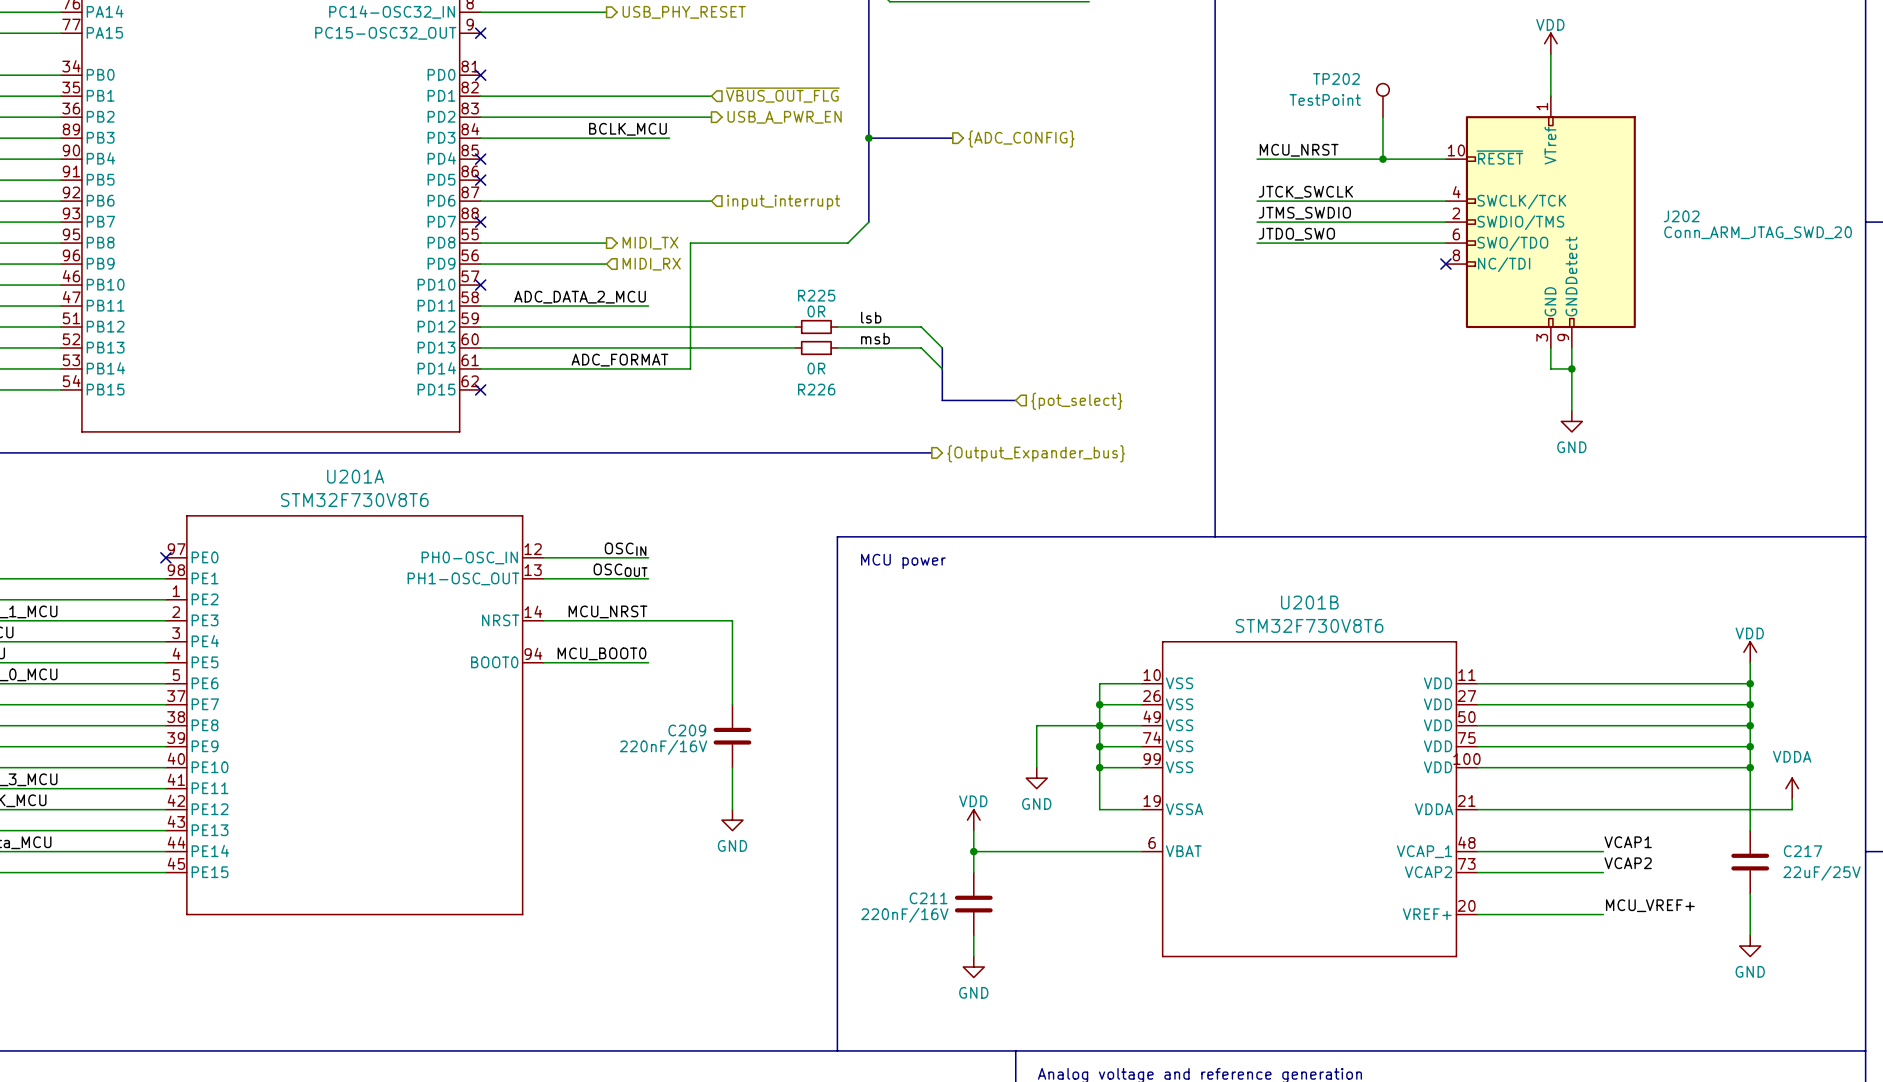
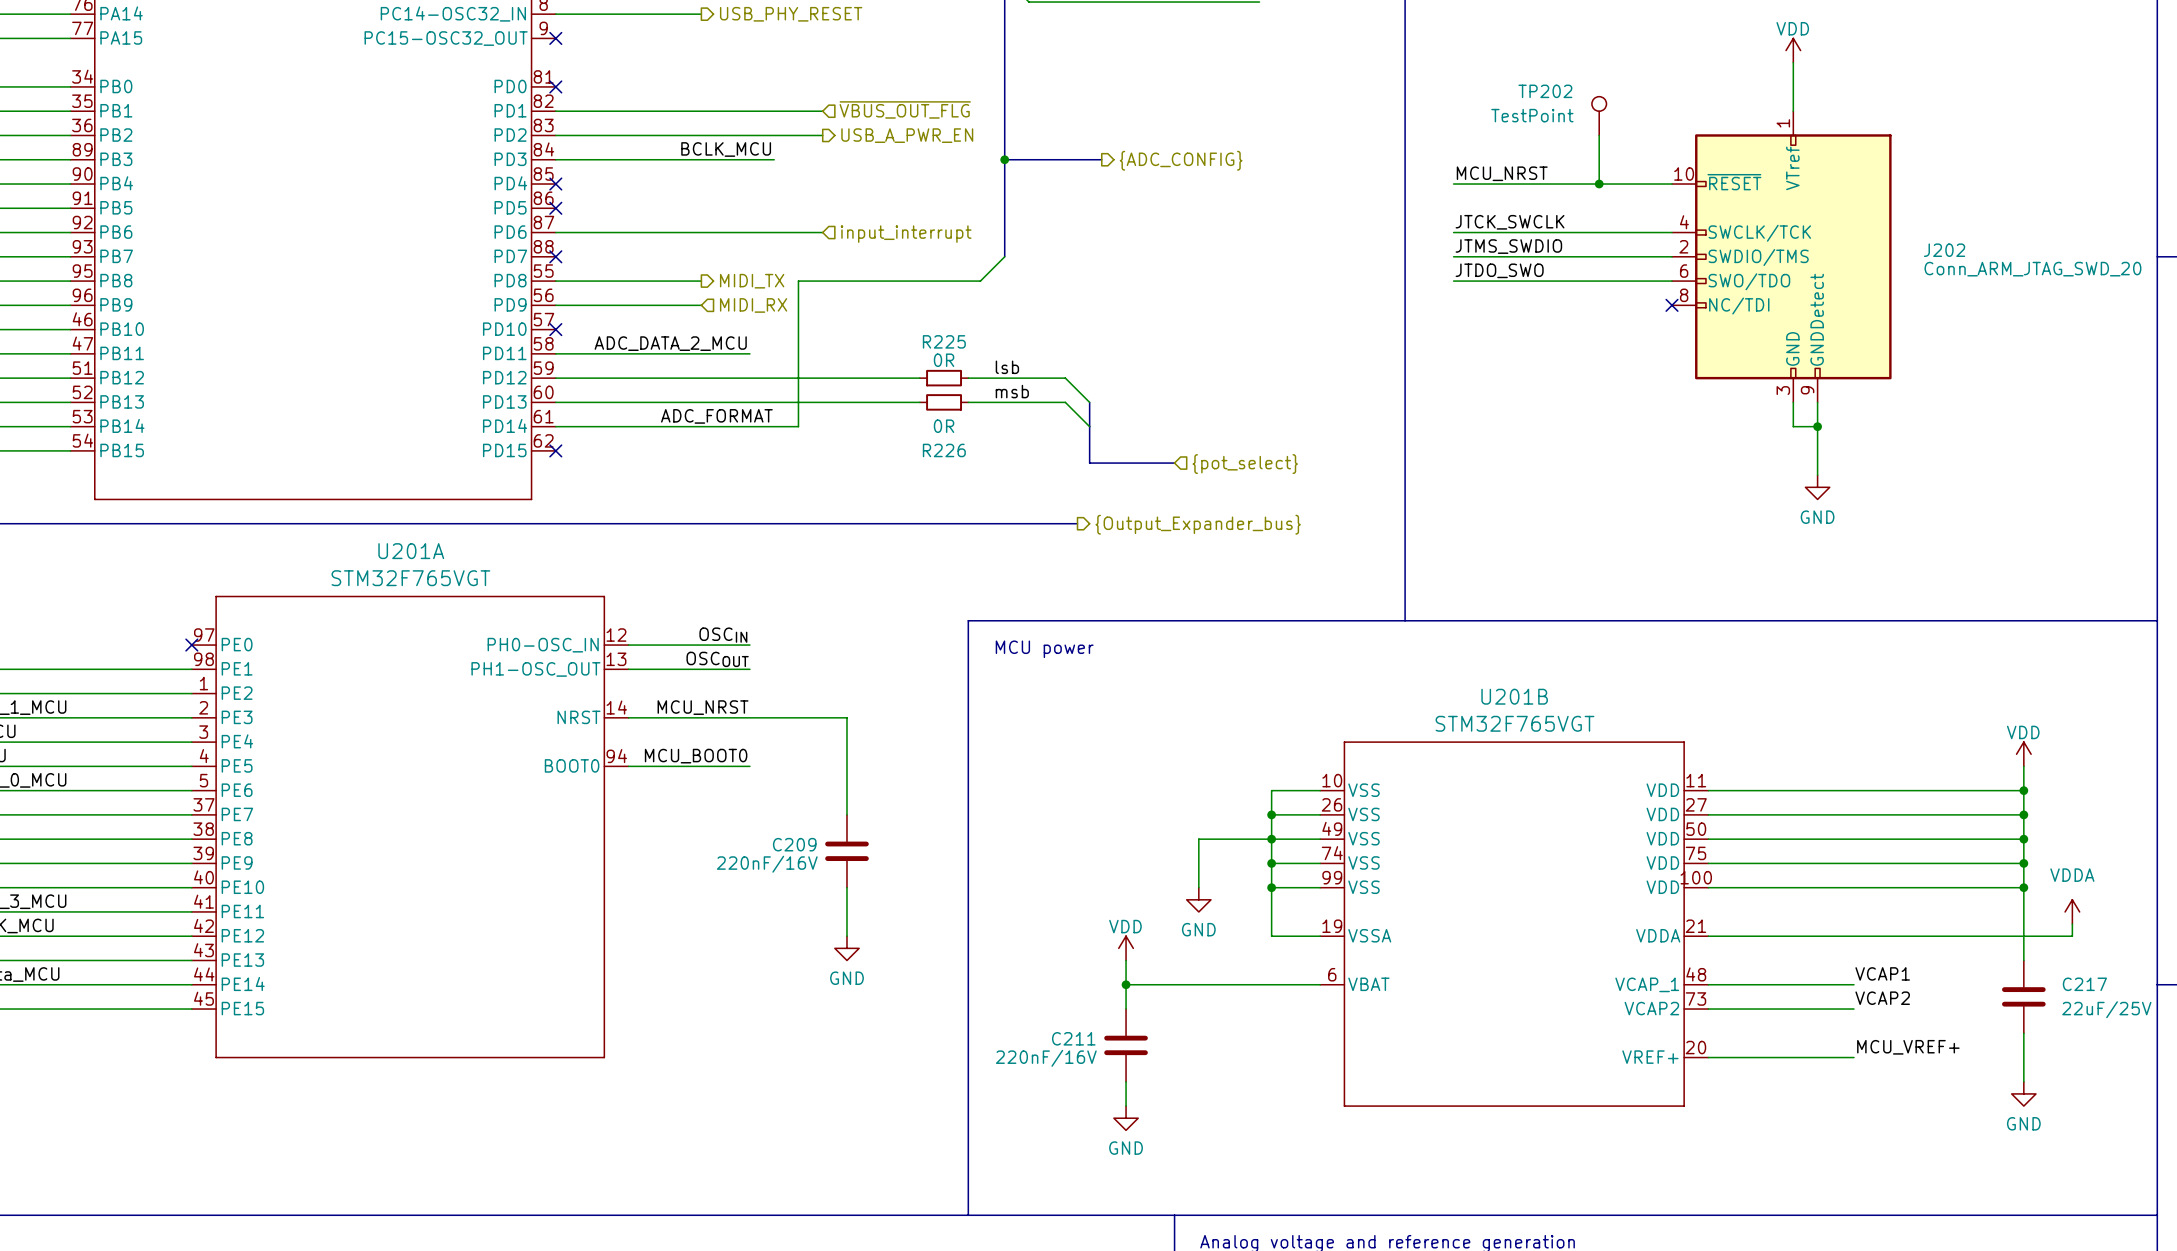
U201A value: STM32F730V8T6 (354, 500) -> STM32F765VGT (410, 578)
U201B value: STM32F730V8T6 (1309, 625) -> STM32F765VGT (1514, 723)

